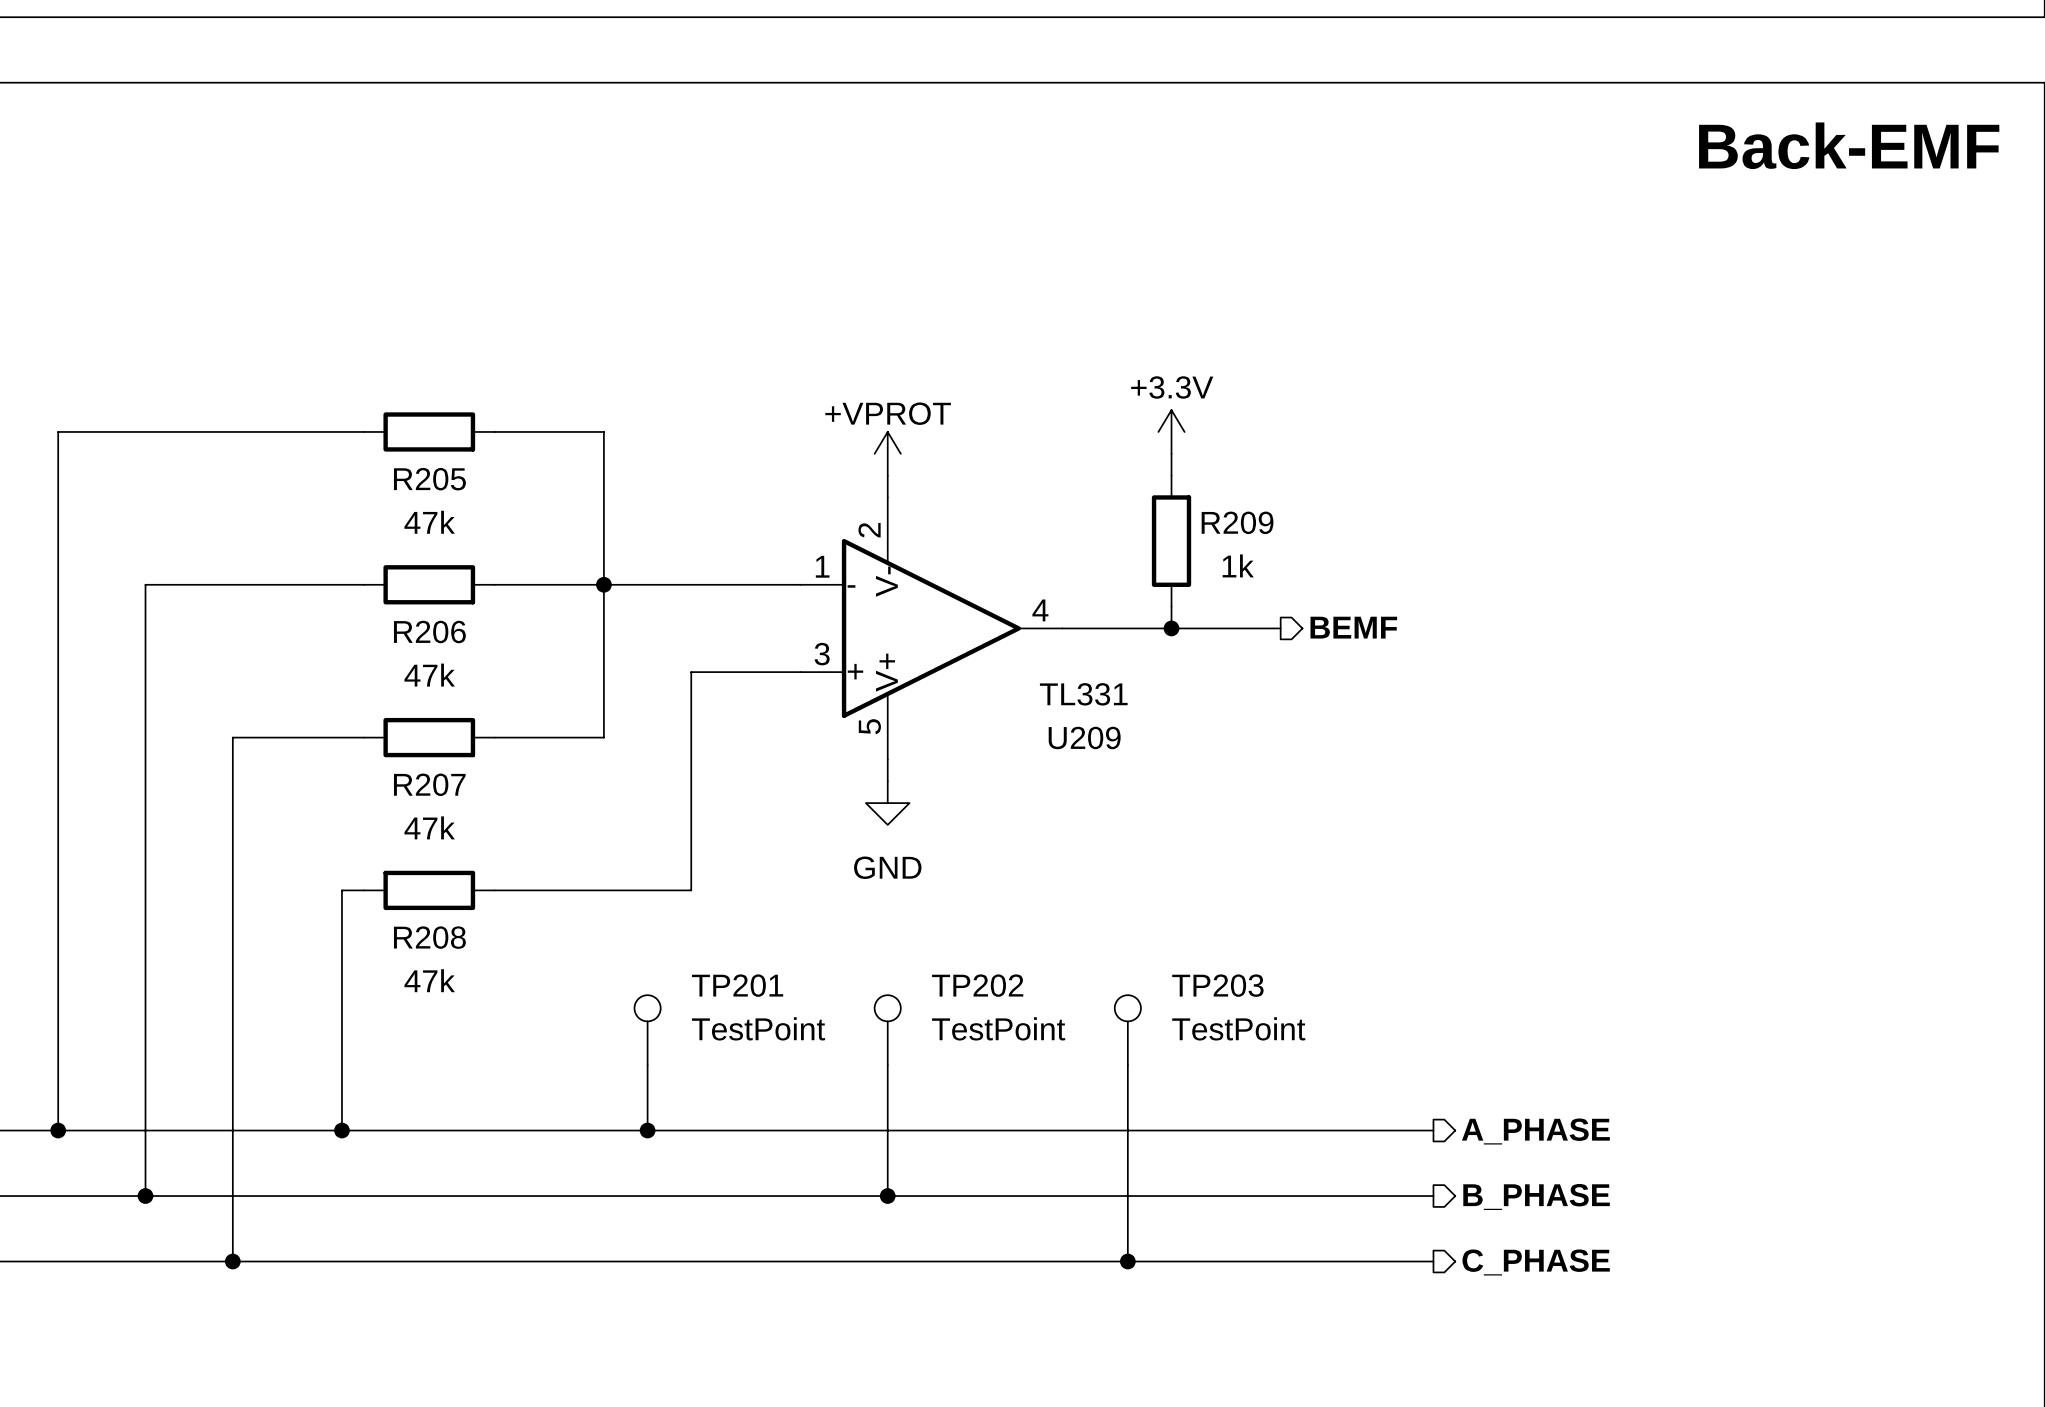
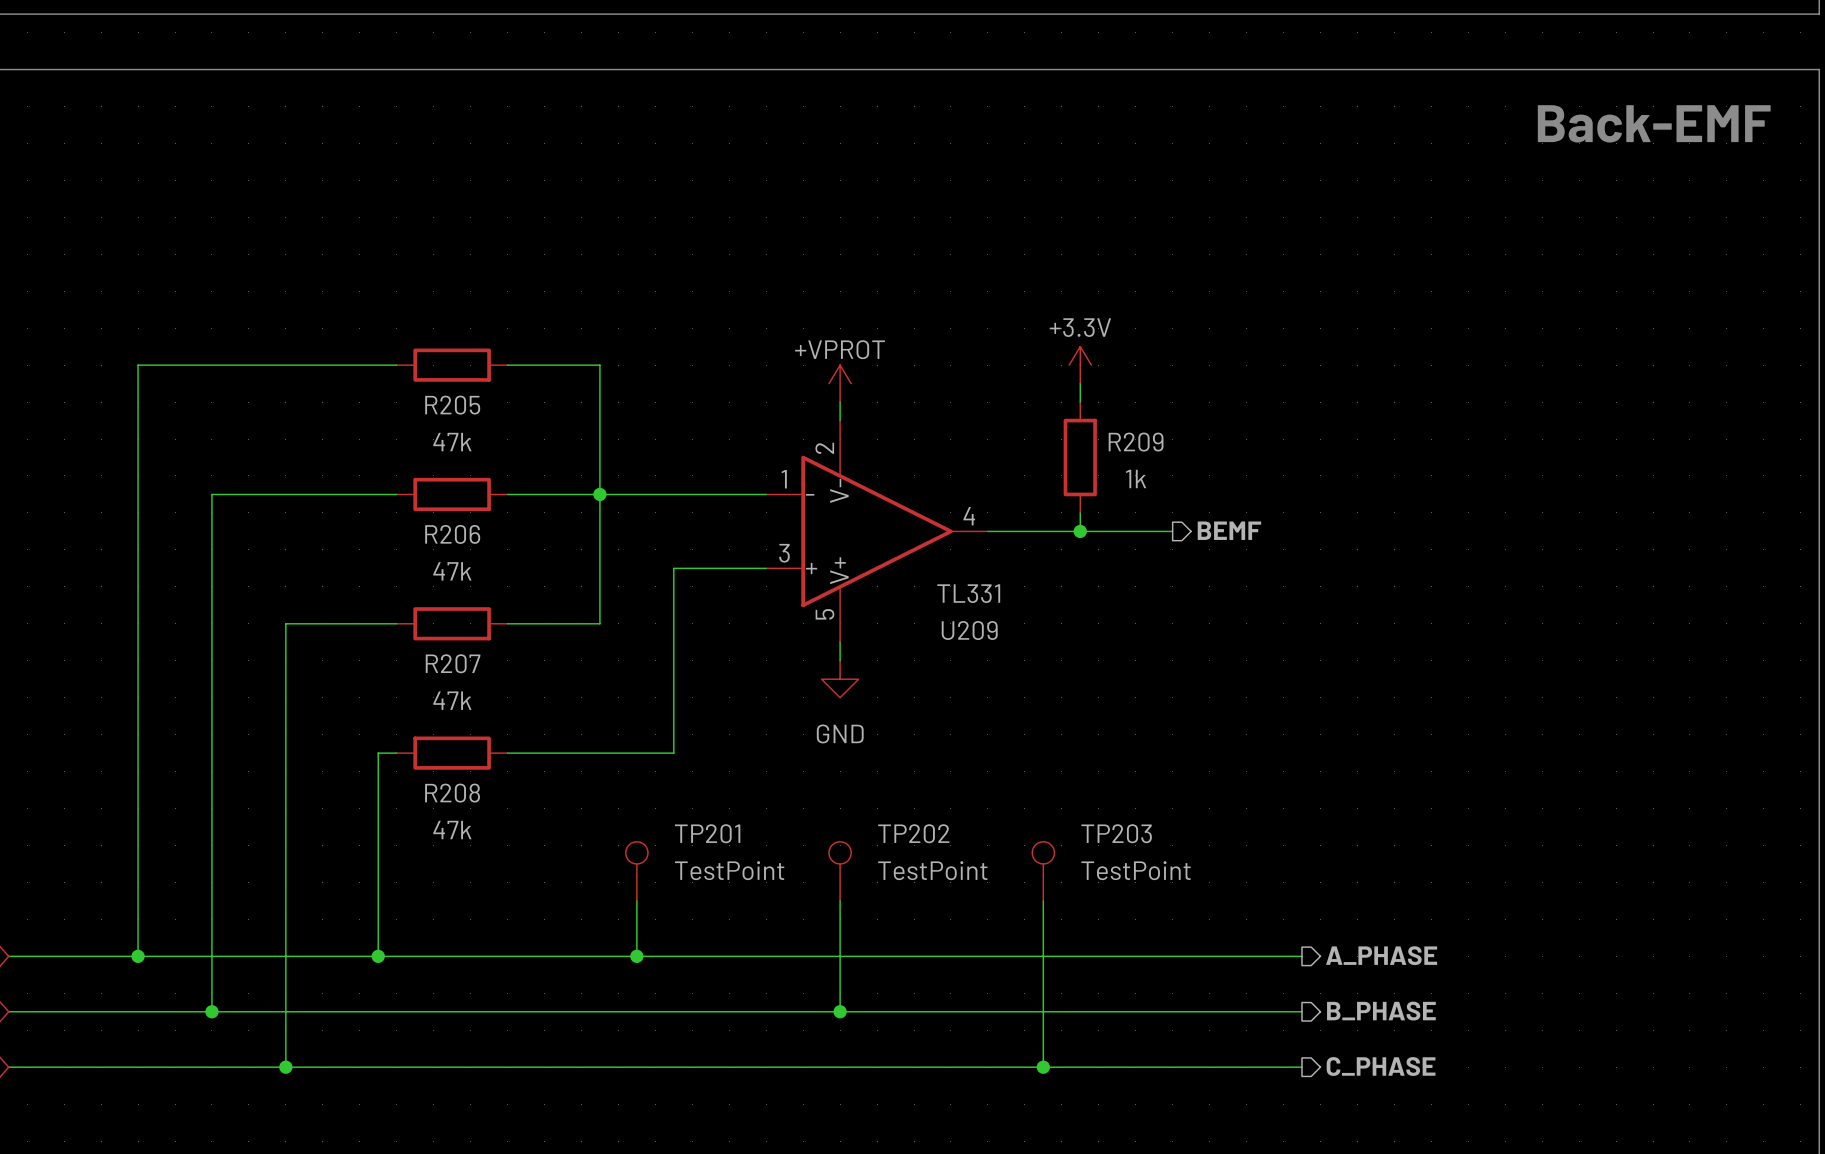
U209 value position: TL331 (1083, 694) -> TL331 (968, 593)
U209 name position: U209 (1084, 737) -> U209 (969, 630)

